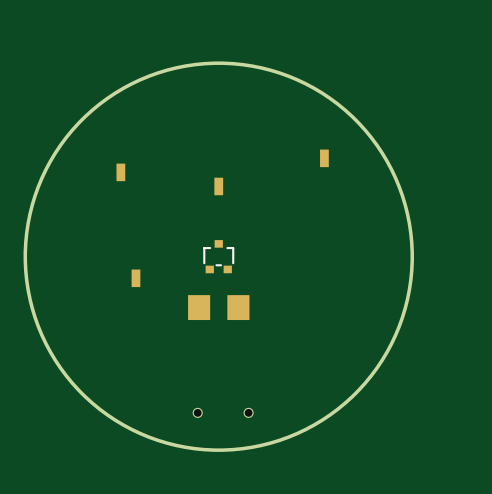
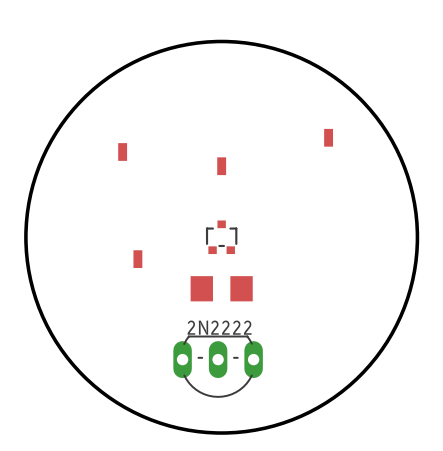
2N2222: none -> (218, 366)
hole: (197, 412) -> none
hole: (248, 412) -> none

